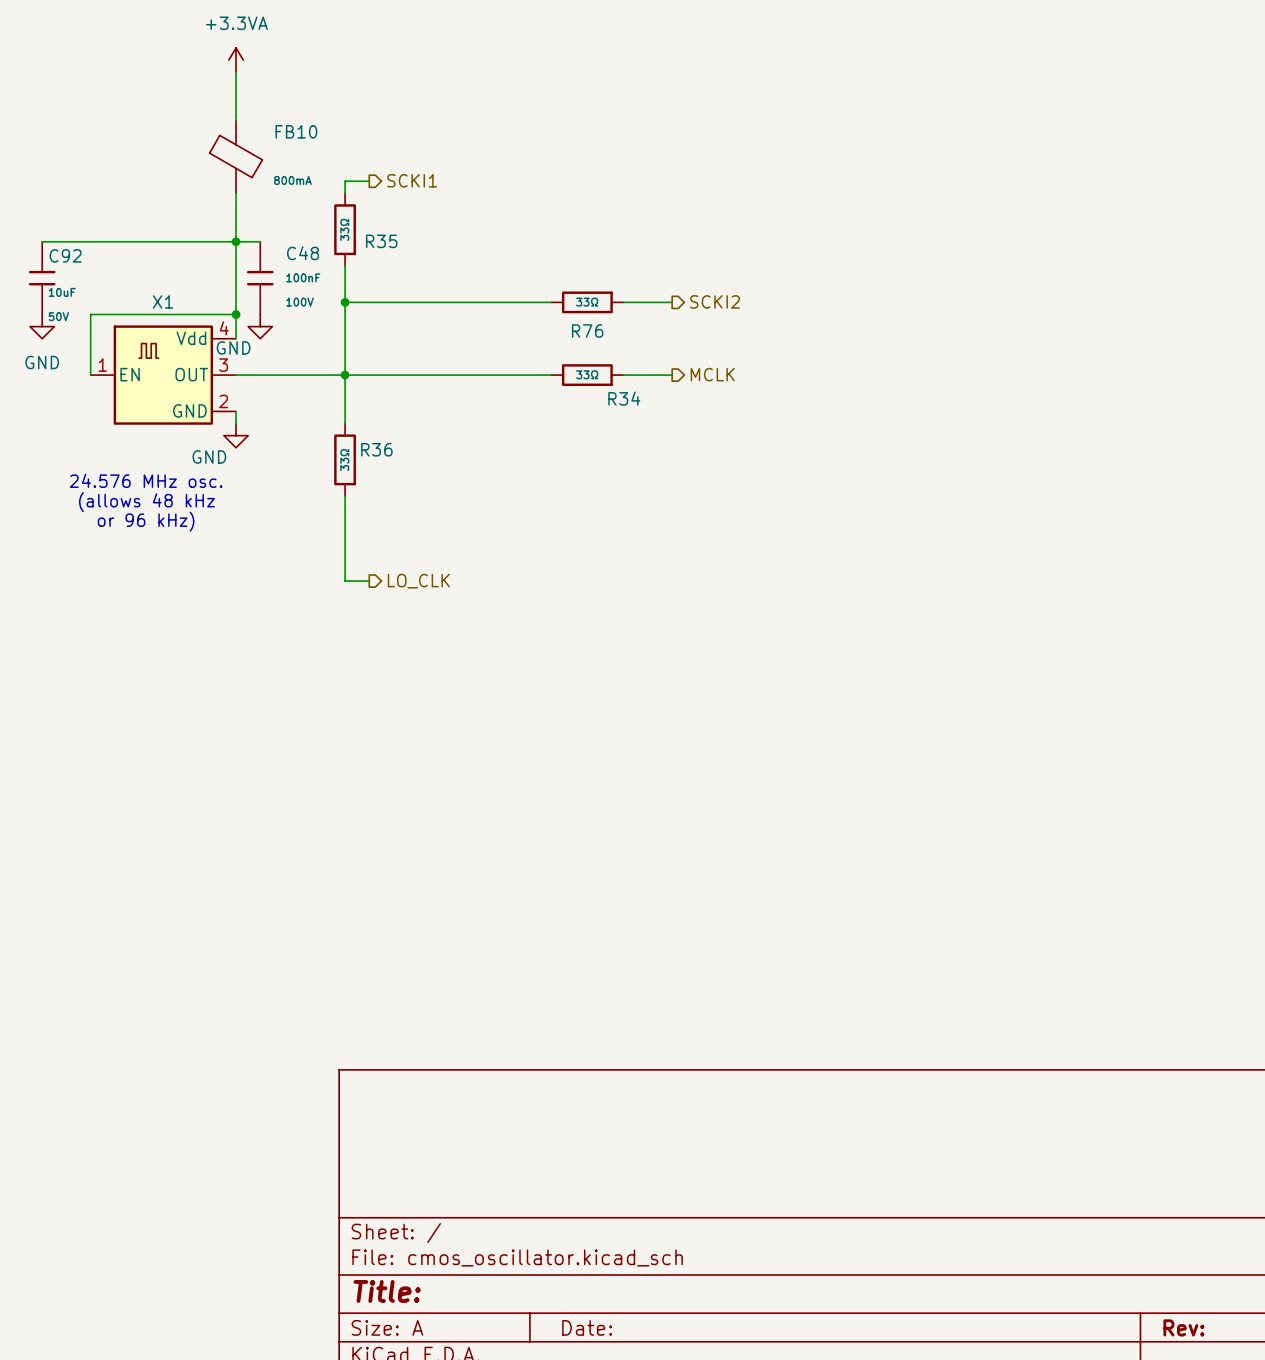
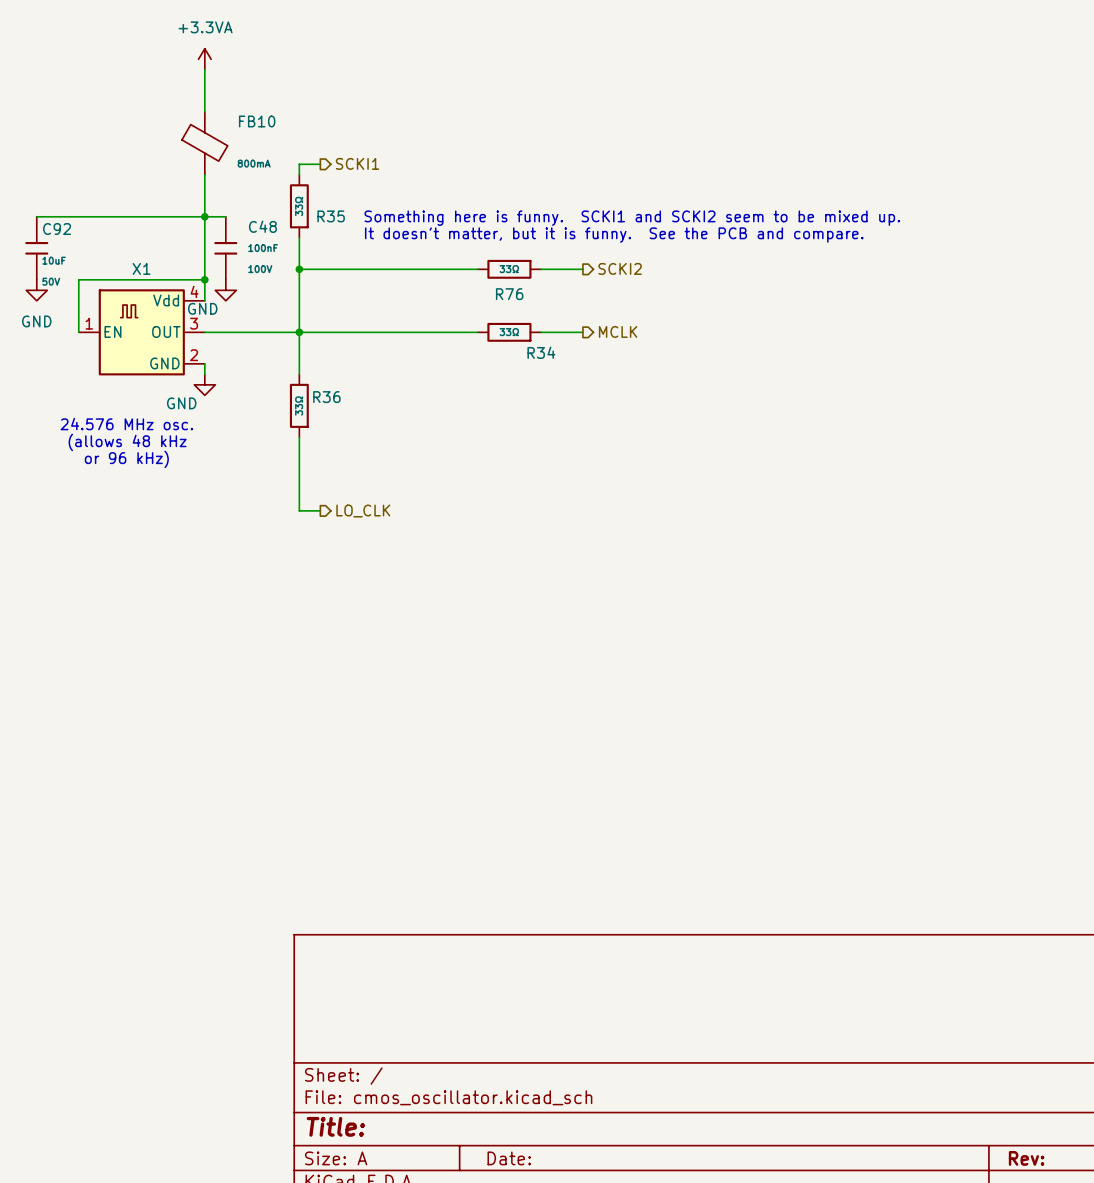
text: none -> Something here is funny. SCKI1 and SCKI2 seem to be mixed up. (632, 218)
text: none -> It doesn't matter, but it is funny. See the PCB and compare. (614, 235)

